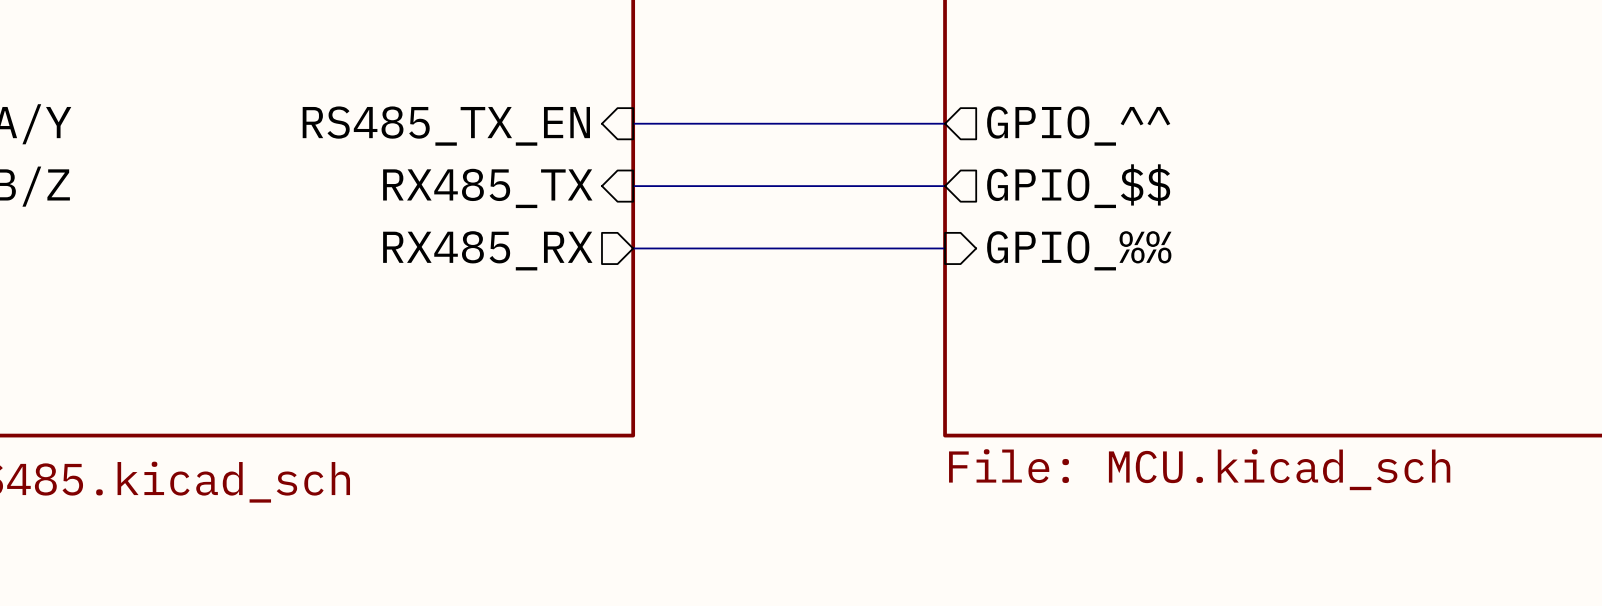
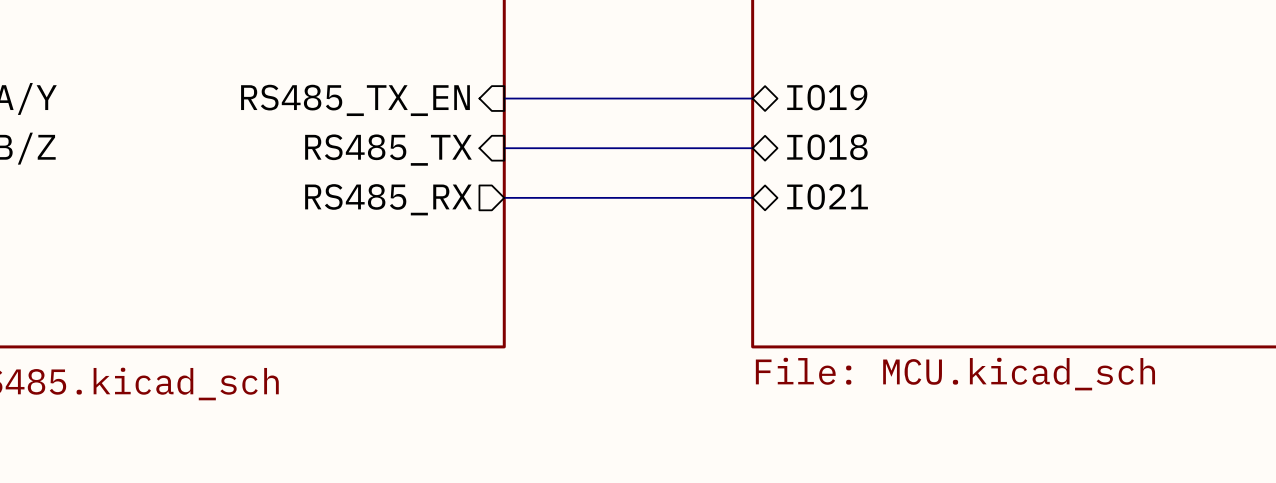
sheet pin shape: output (1078, 126) -> bidirectional (827, 97)
sheet pin: GPIO_^^ (1078, 126) -> IO19 (827, 97)
sheet pin shape: output (1078, 186) -> bidirectional (827, 147)
sheet pin: GPIO_$$ (1078, 186) -> IO18 (827, 147)
sheet pin: RX485_TX (487, 188) -> RS485_TX (388, 150)
sheet pin: RX485_RX (487, 250) -> RS485_RX (388, 199)
sheet pin shape: input (1079, 250) -> bidirectional (827, 196)
sheet pin: GPIO_%% (1079, 250) -> IO21 (827, 196)

